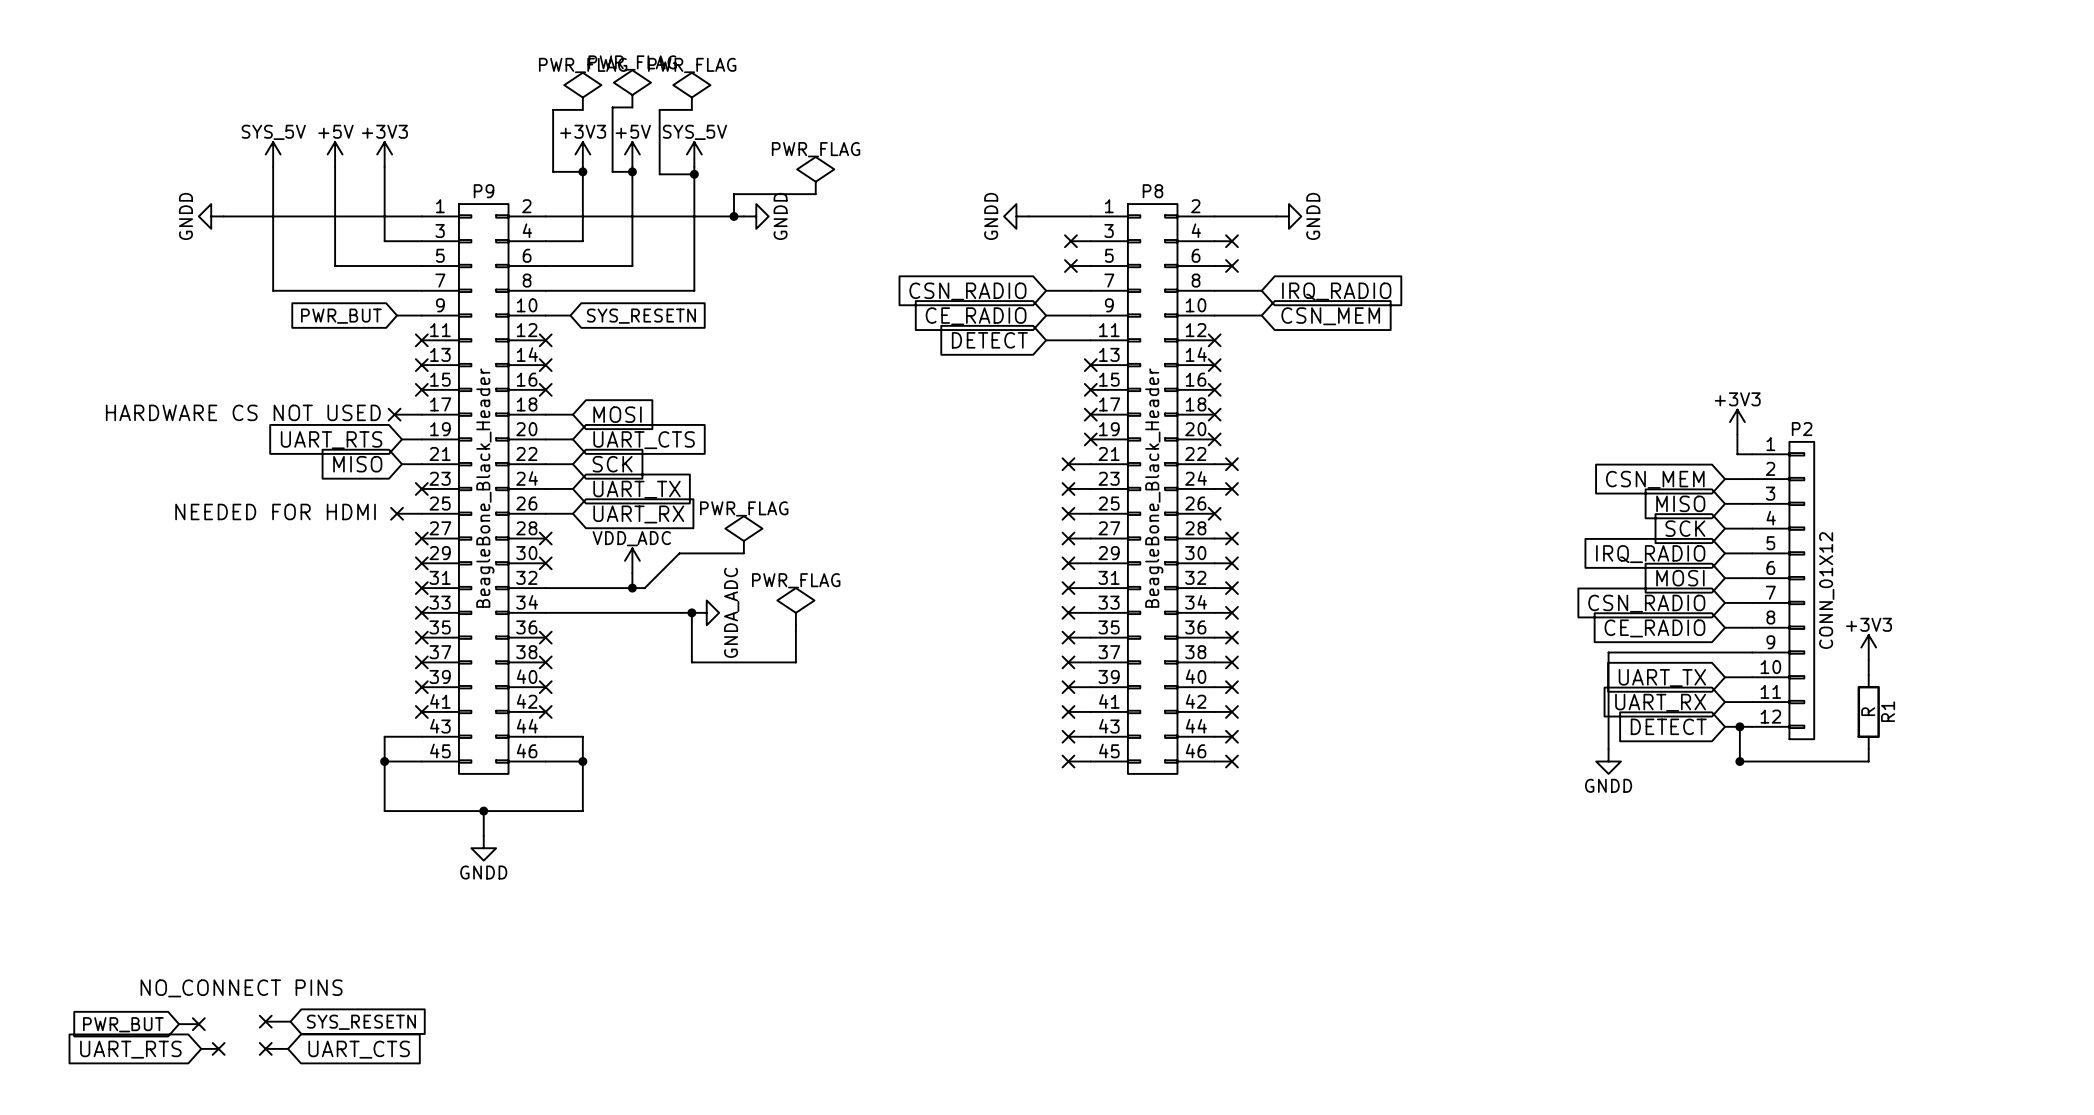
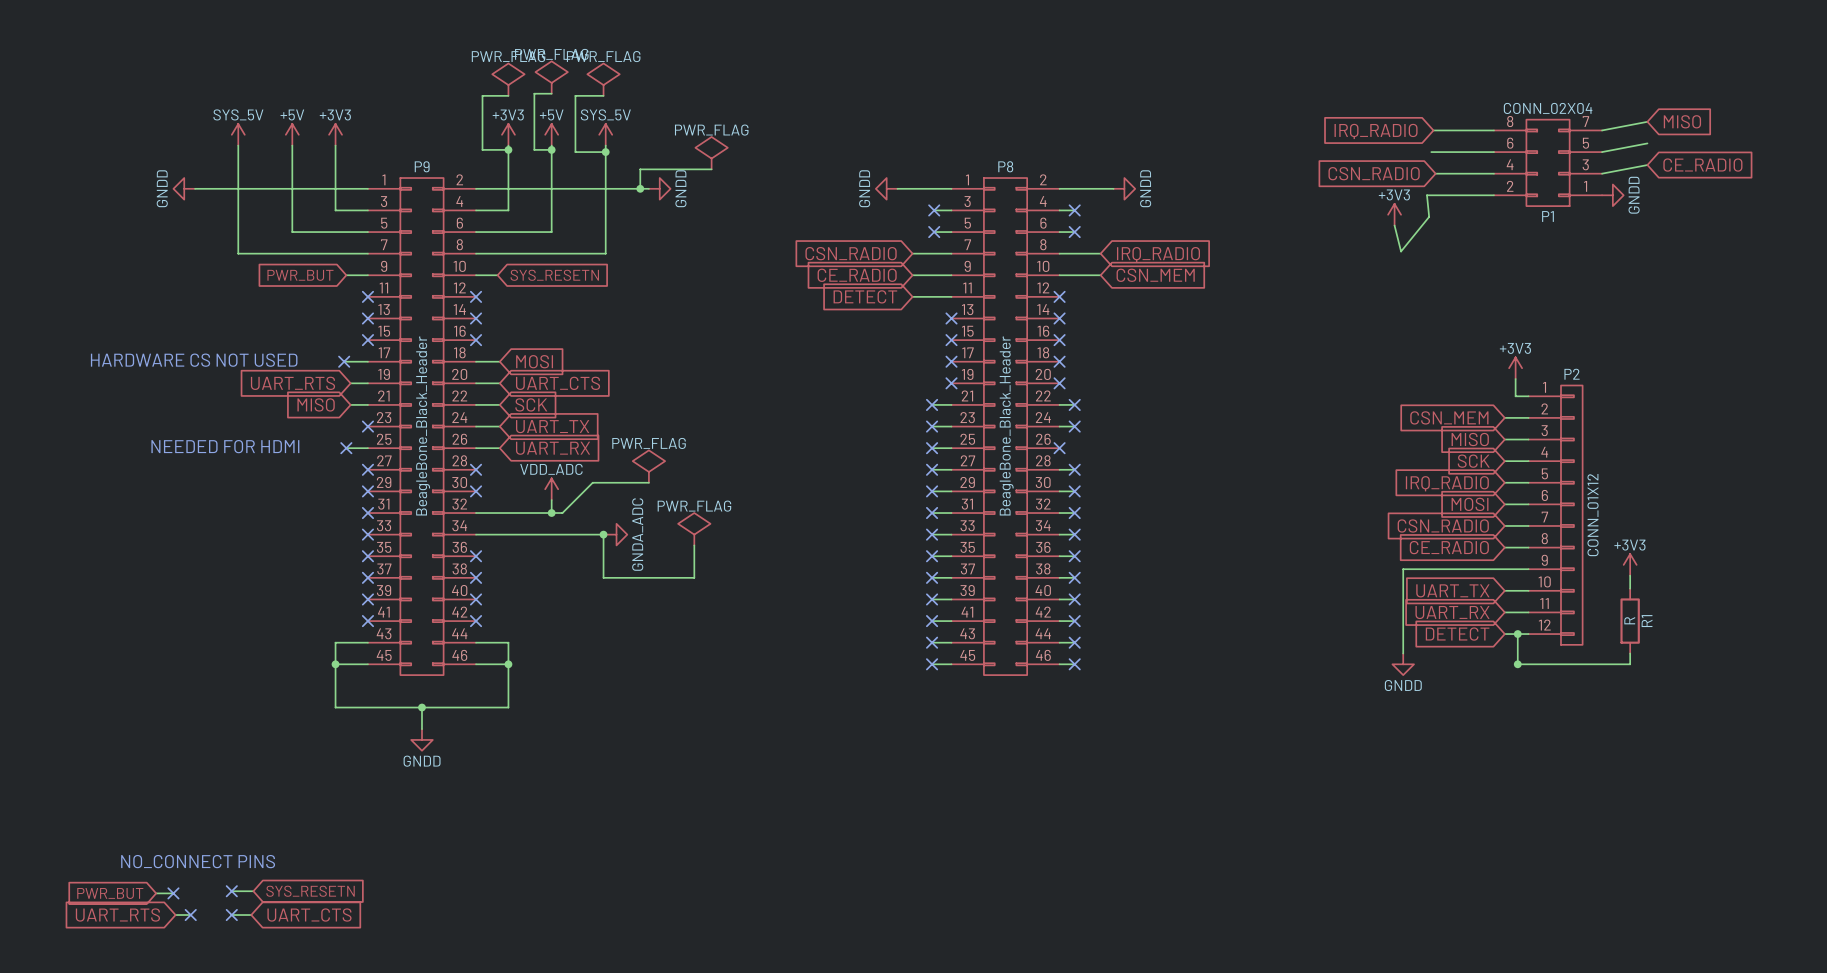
wire: none -> (1647, 121) (1602, 130)
global label: none -> MISO (1682, 121)
wire: none -> (1433, 130) (1493, 130)
global label: none -> IRQ_RADIO (1376, 131)
wire: none -> (1647, 143) (1602, 152)
wire: none -> (1431, 152) (1493, 152)
P1: none -> CONN_02X04 (1548, 162)
wire: none -> (1647, 165) (1602, 173)
global label: none -> CE_RADIO (1702, 165)
global label: none -> CSN_RADIO (1374, 173)
wire: none -> (1435, 173) (1493, 173)
wire: none -> (1493, 195) (1426, 195) (1429, 216) (1401, 251) (1394, 225)
power symbol: none -> GNDD (1612, 195)
power symbol: none -> +3V3 (1394, 214)

